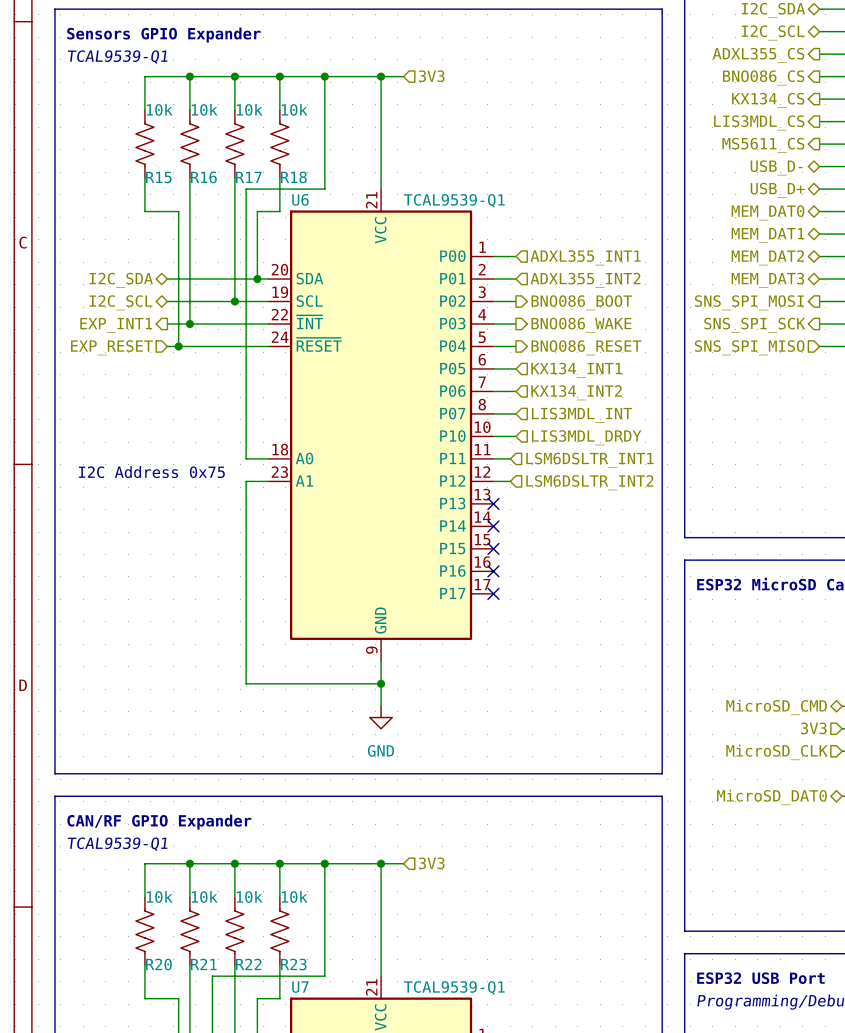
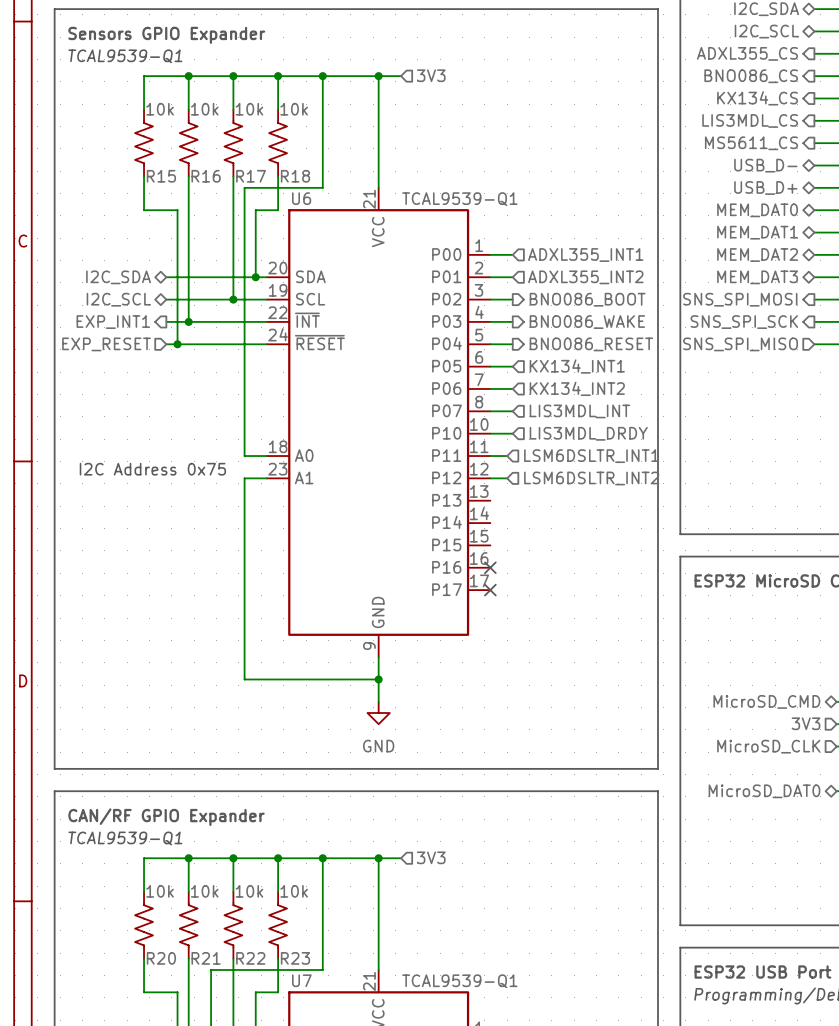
no-connect mark: (493, 503) -> none
no-connect mark: (493, 526) -> none
no-connect mark: (493, 548) -> none

